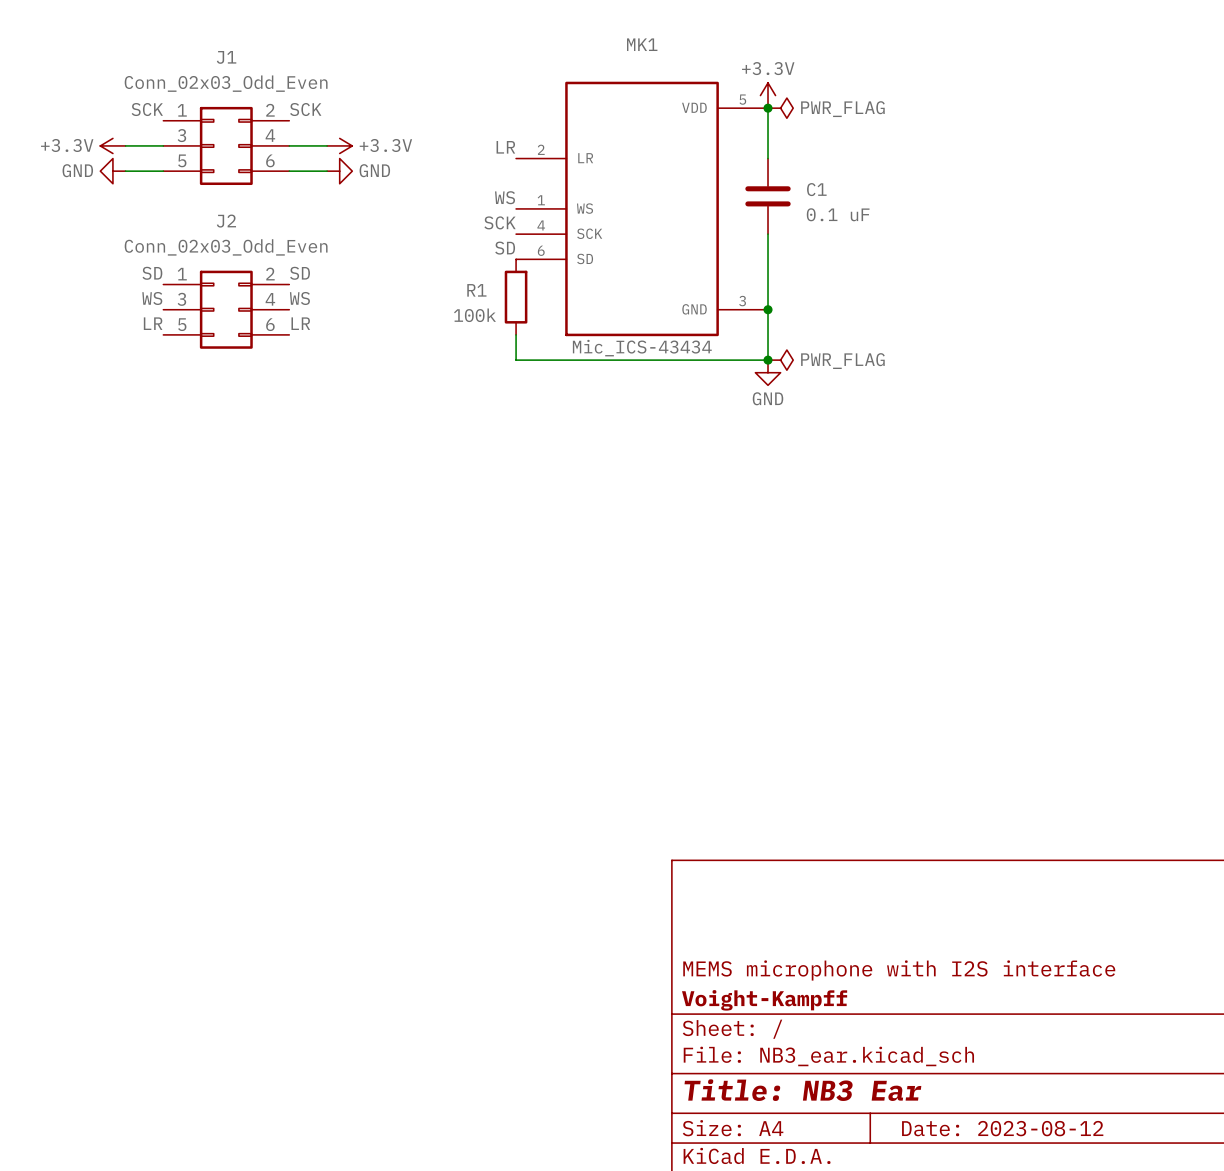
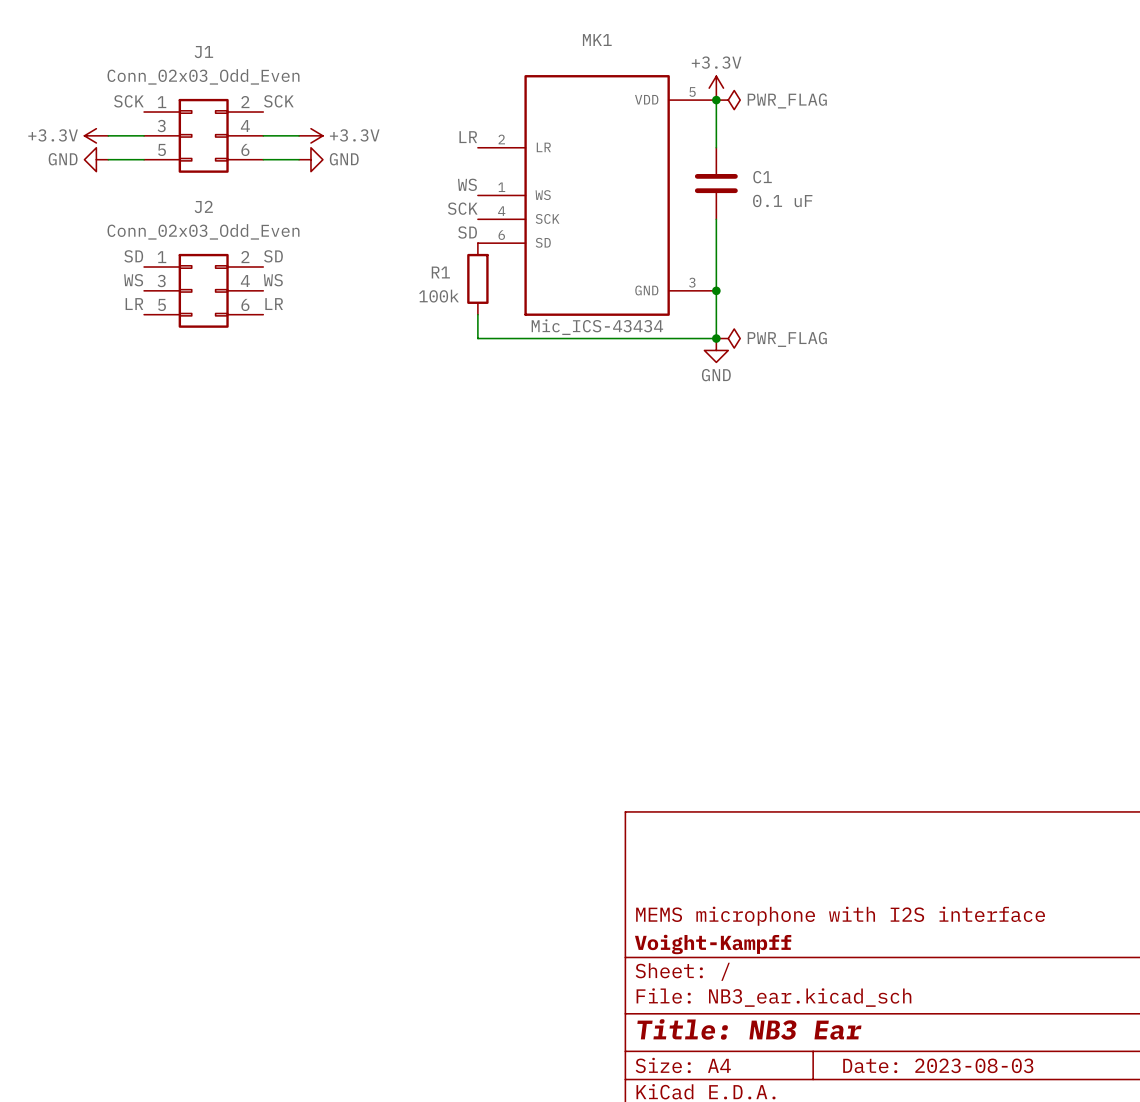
title block: Date: 2023-08-12 (1002, 1128) -> Date: 2023-08-03 (938, 1065)

